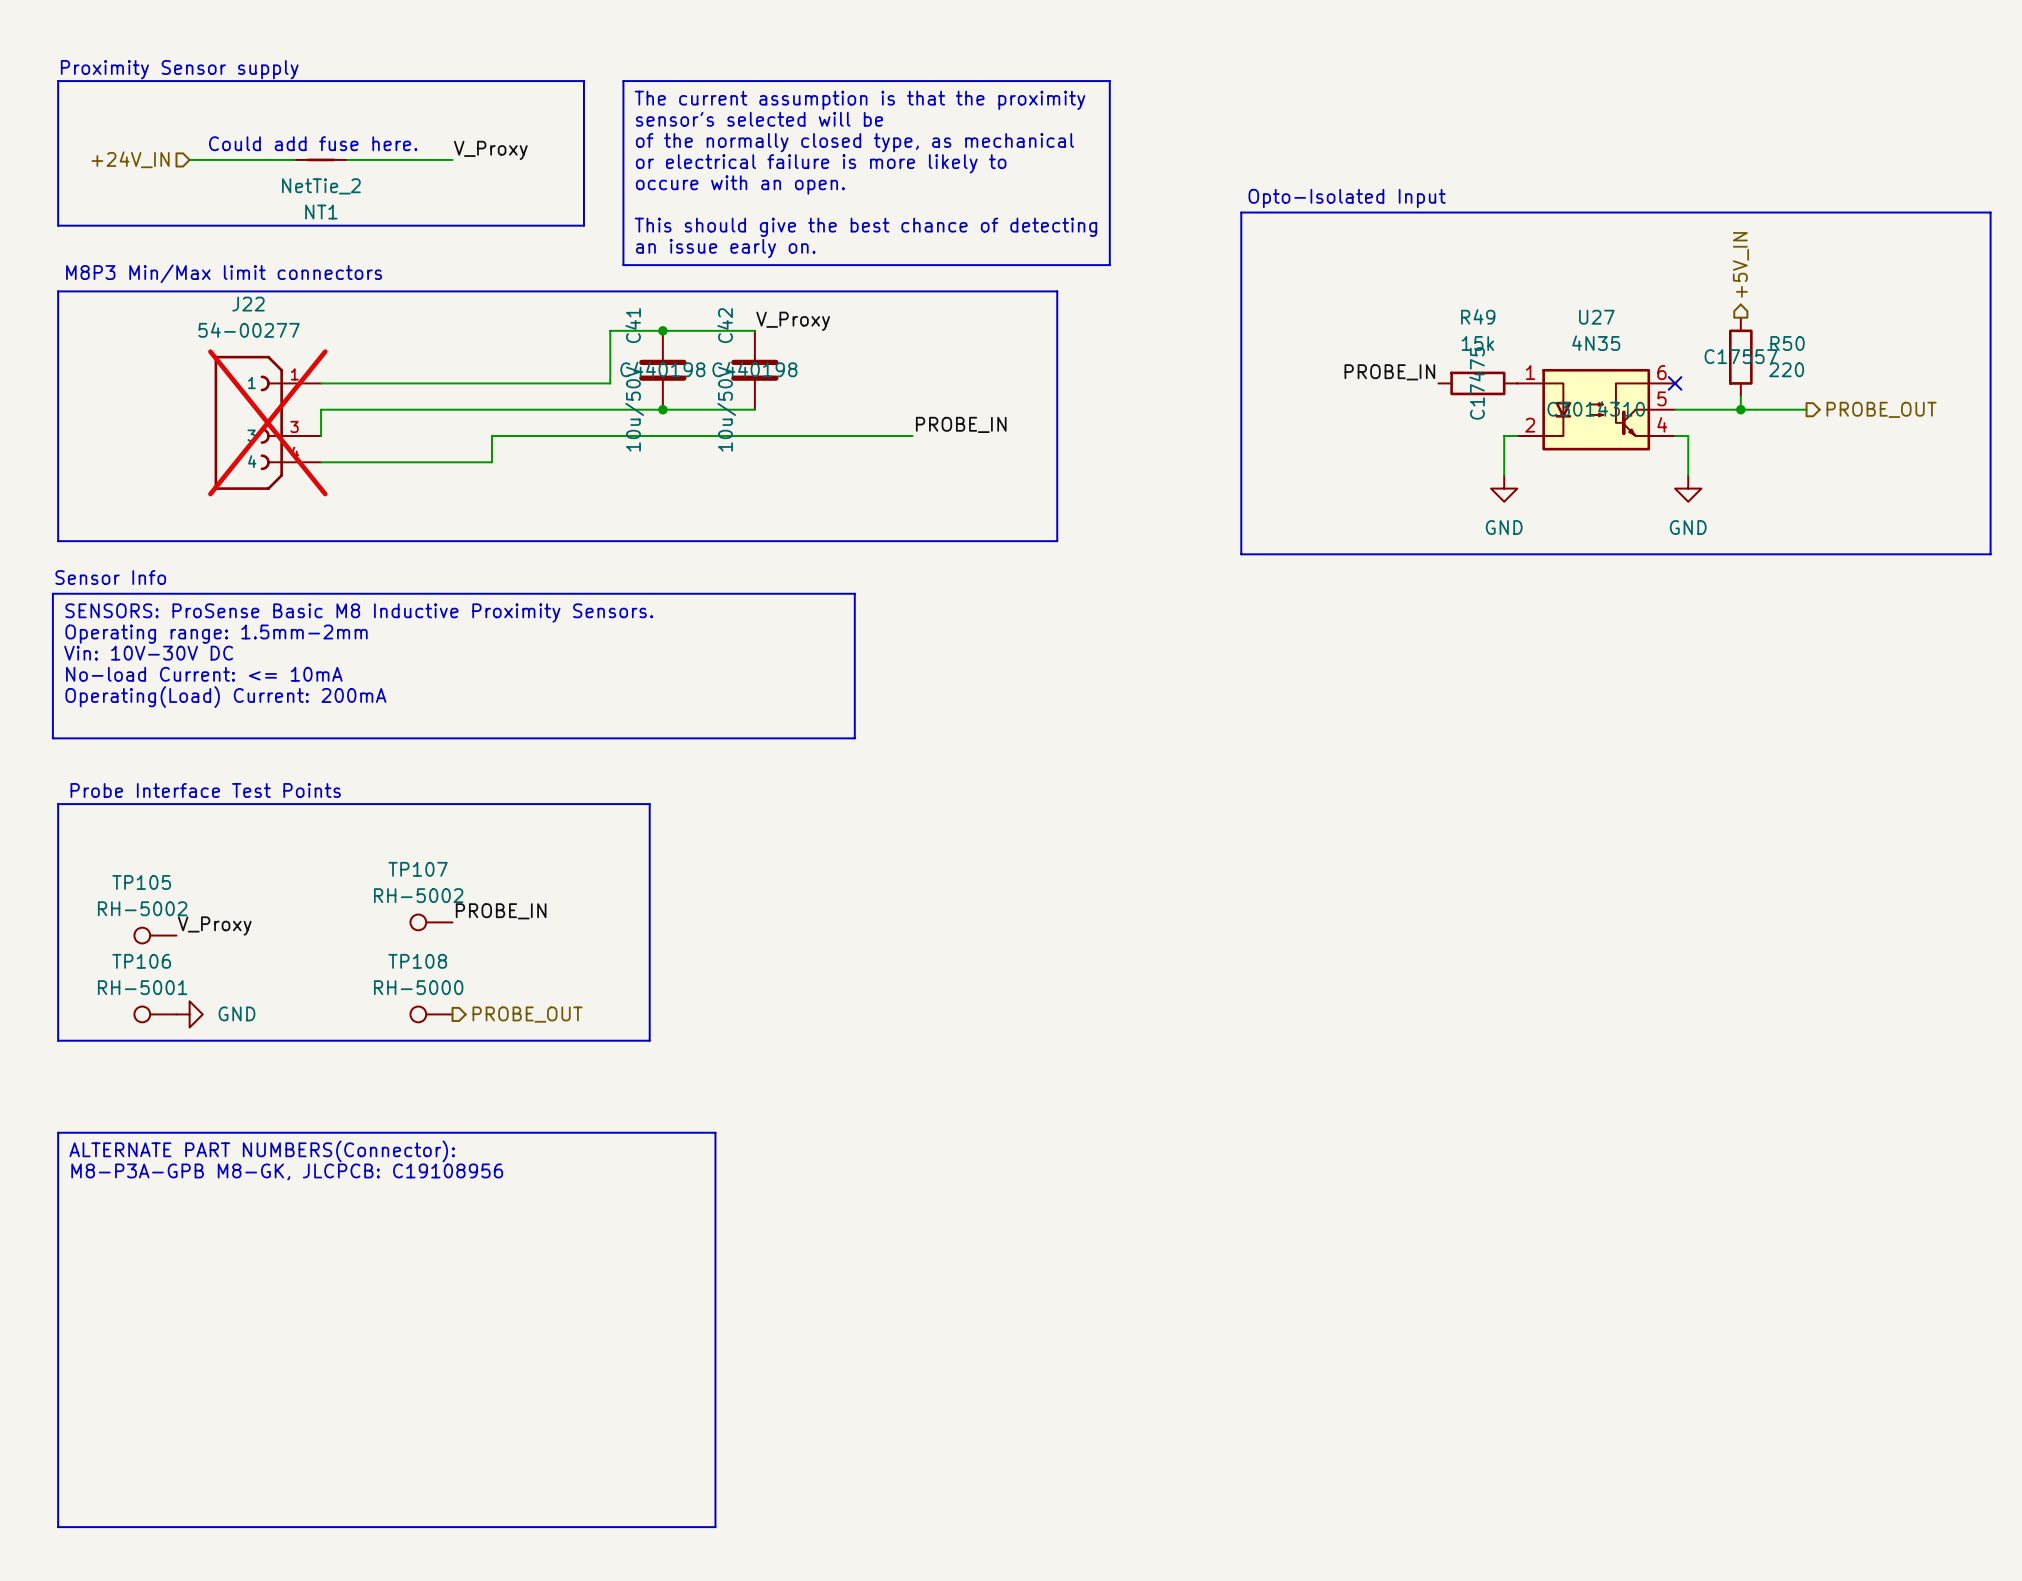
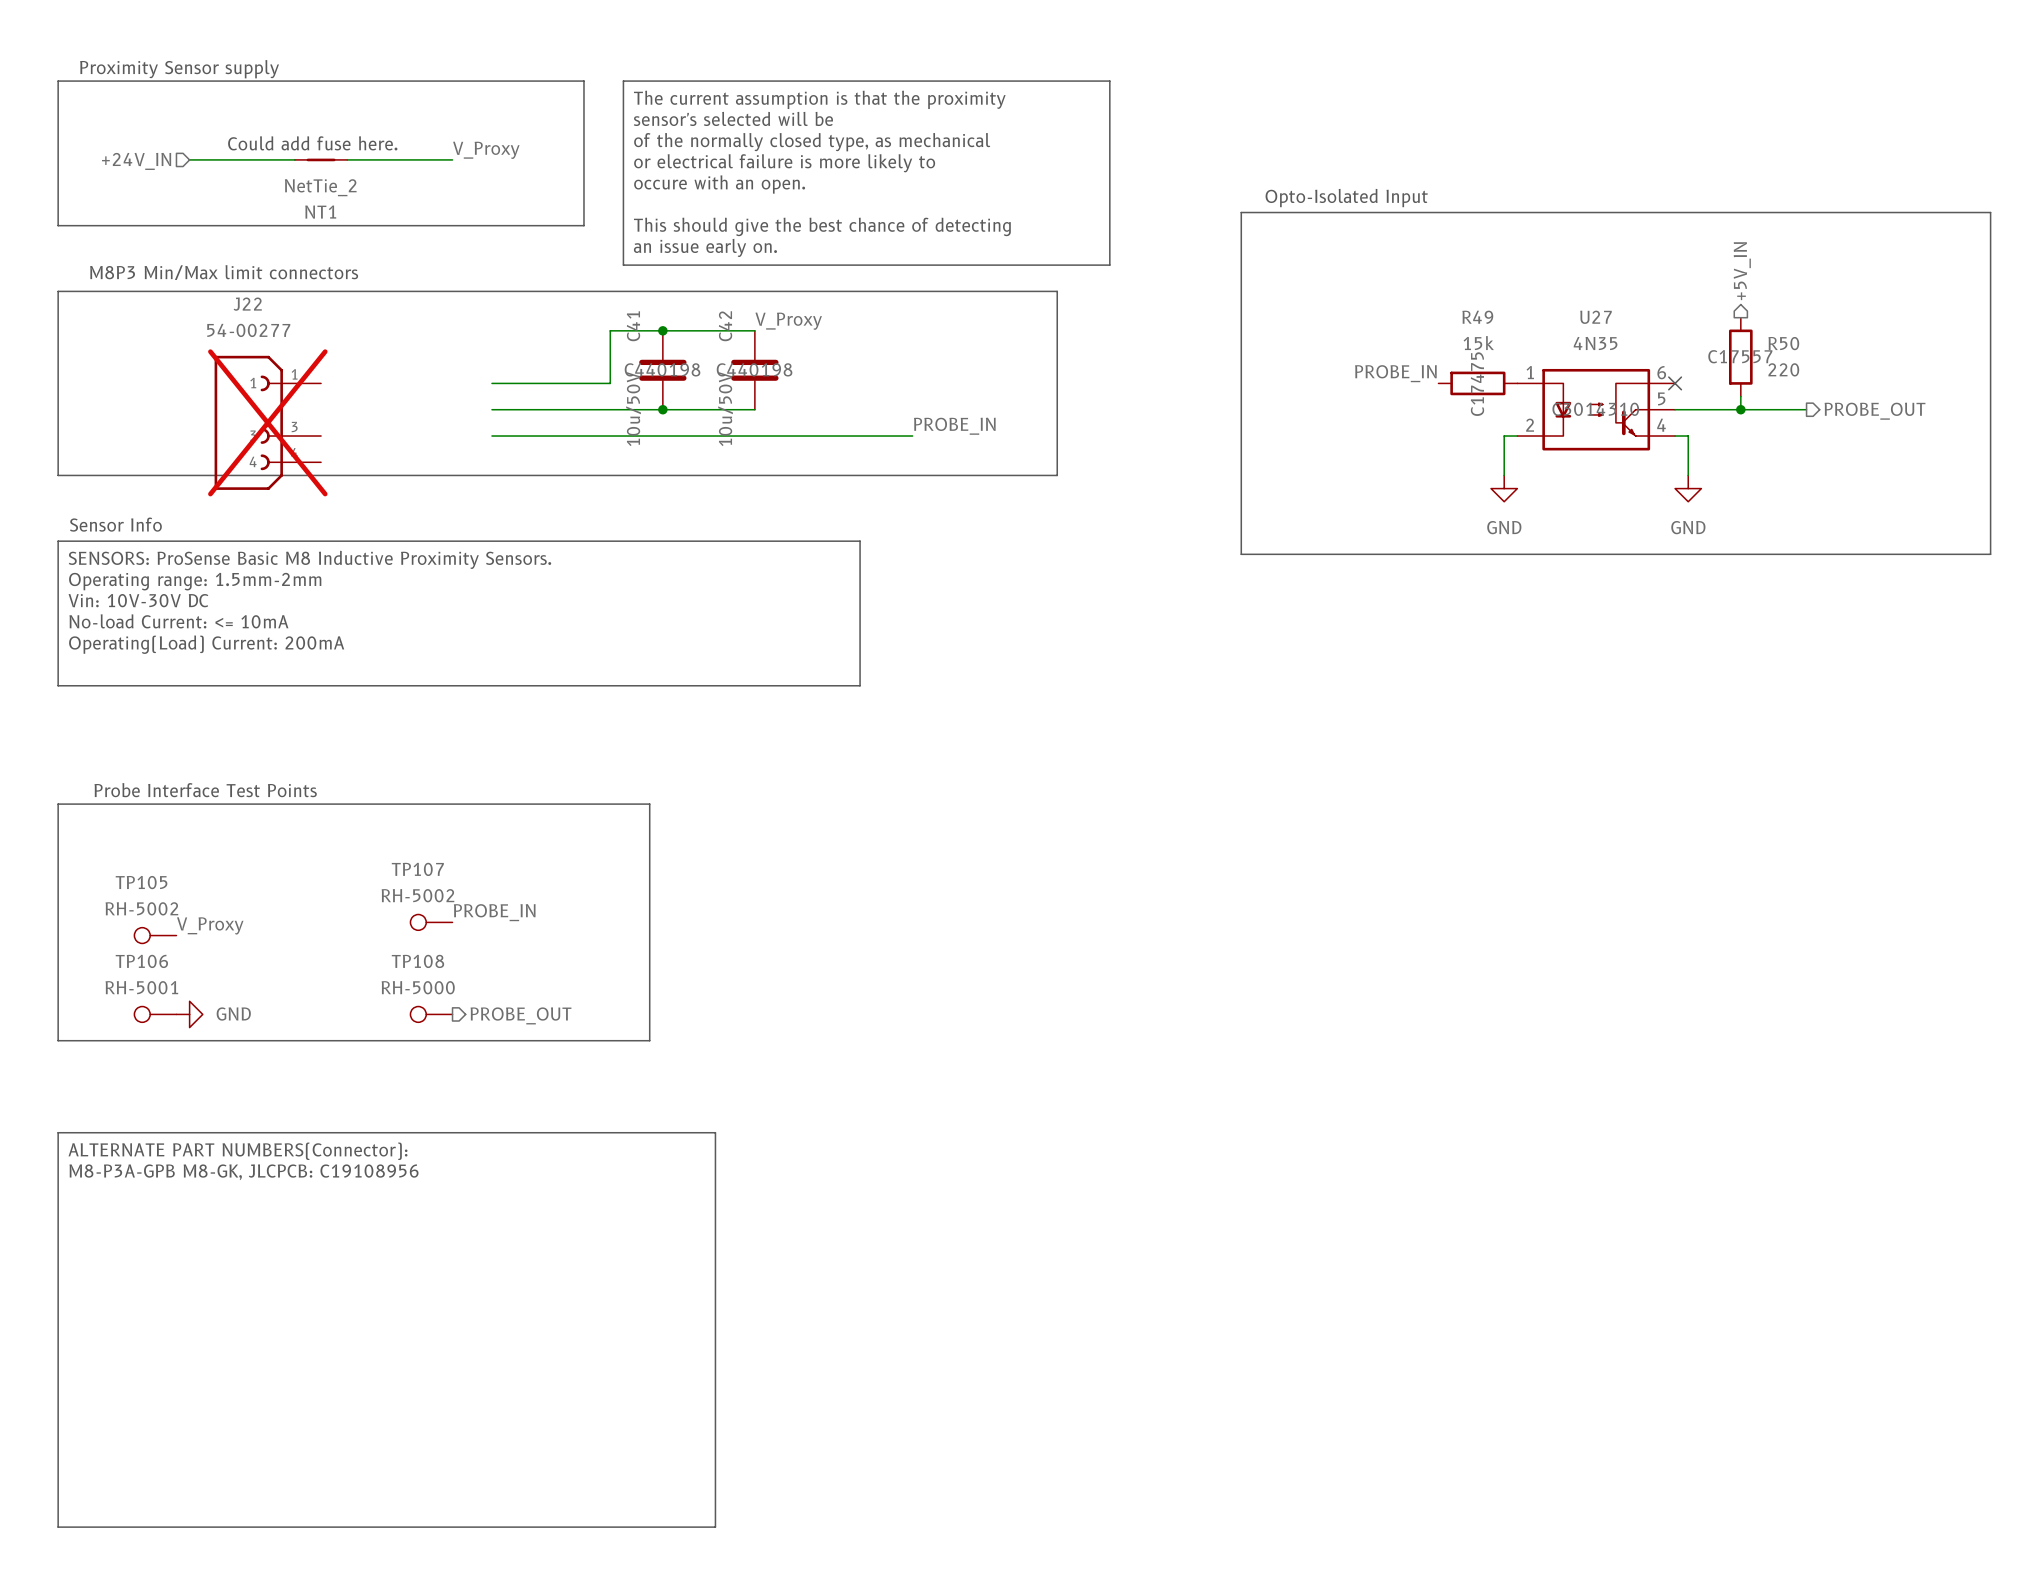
wire: (321, 383) (491, 383) -> none
wire: (491, 409) (321, 409) (321, 436) -> none
wire: (491, 436) (491, 462) (321, 462) -> none
line: (58, 475) (58, 541) -> (860, 541) (860, 685) (58, 685) (58, 541)
line: (1057, 475) (1057, 541) (860, 541) -> (1057, 475) (58, 475)
text position: Sensor Info (110, 577) -> Sensor Info (115, 524)
line: (52, 593) (854, 593) (854, 738) (52, 738) (52, 593) -> none
text position: SENSORS: ProSense Basic M8 Inductive Proximity Sensors. (359, 613) -> SENSORS: ProSense Basic M8 Inductive Proximity Sensors. (309, 559)
text position: Operating range: 1.5mm-2mm (216, 634) -> Operating range: 1.5mm-2mm (195, 581)
text position: Vin: 10V-30V DC (148, 653) -> Vin: 10V-30V DC (138, 600)
text position: No-load Current: <= 10mA (204, 674) -> No-load Current: <= 10mA (178, 621)
text position: Operating(Load) Current: 200mA (225, 697) -> Operating(Load) Current: 200mA (206, 644)

